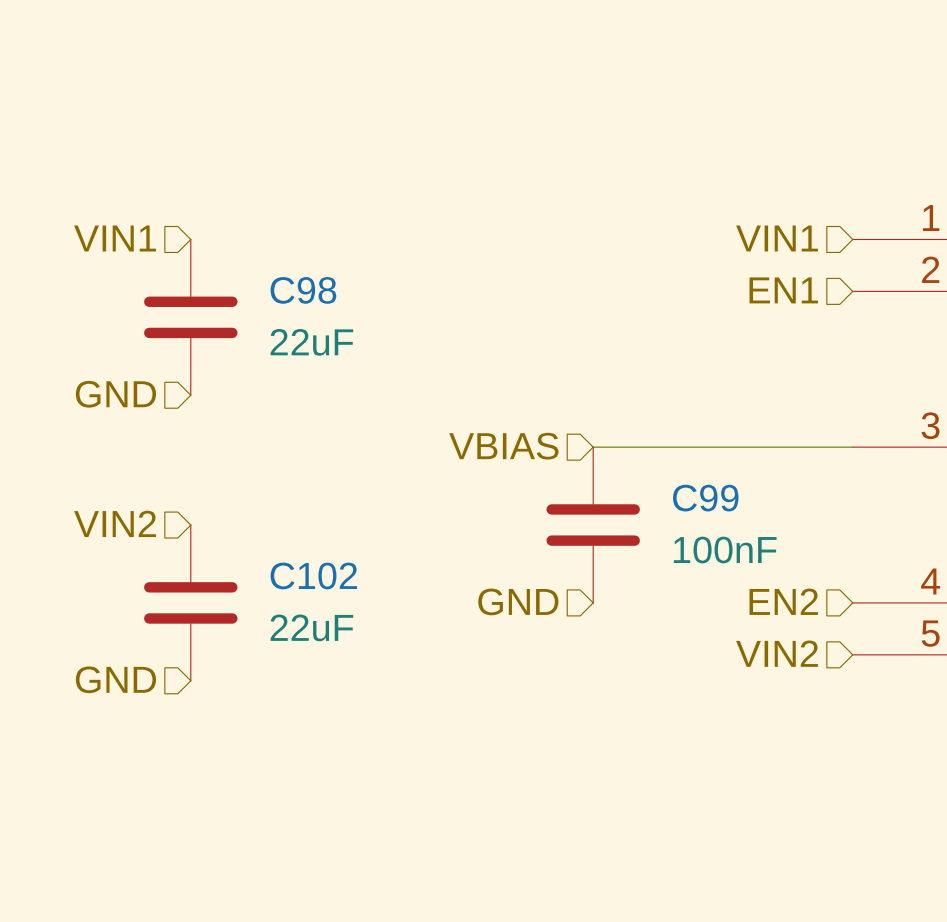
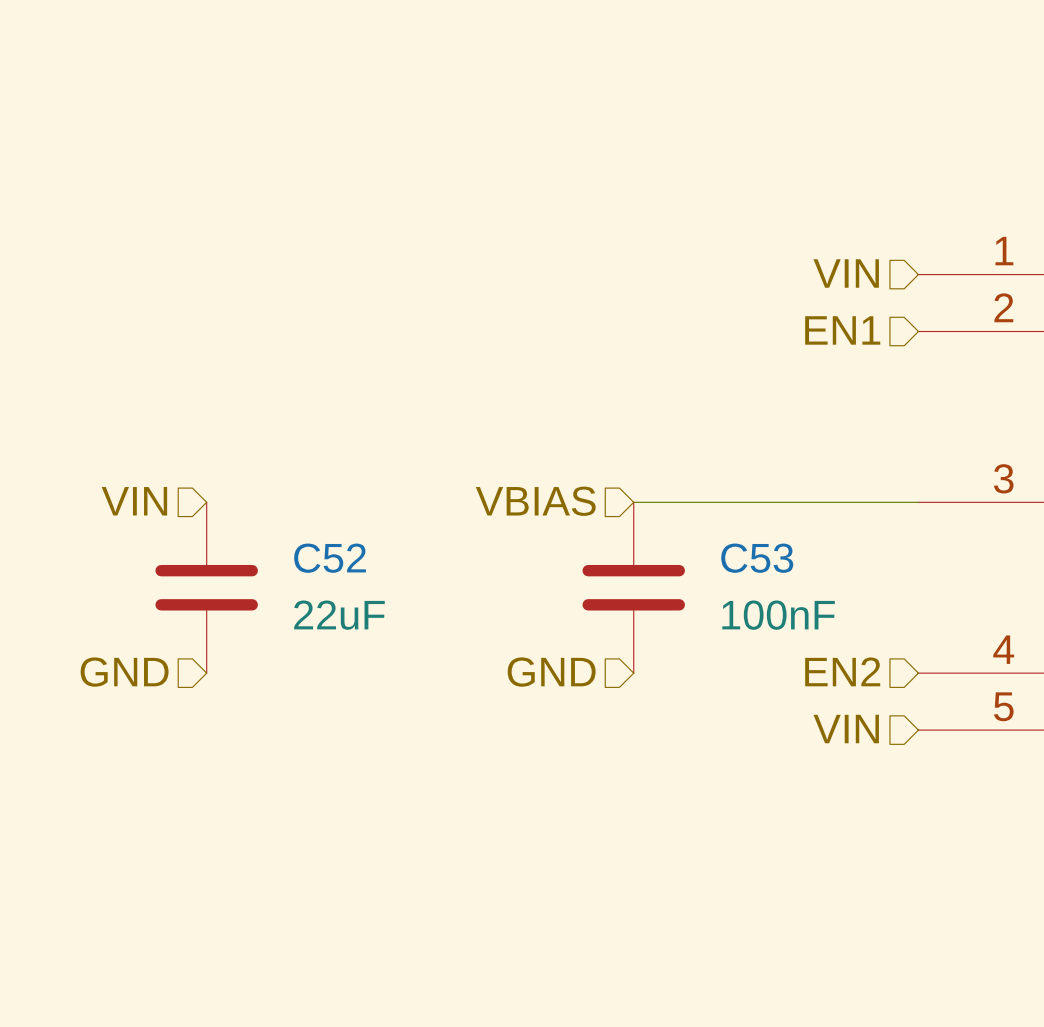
hierarchical label: VIN1 (115, 238) -> none
hierarchical label: VIN1 (777, 238) -> VIN (846, 273)
C98: 22uF (190, 317) -> none
hierarchical label: GND (115, 394) -> none
hierarchical label: none -> VIN (134, 501)
C99 name: C99 (705, 498) -> C53 (757, 558)
hierarchical label: VIN2 (115, 523) -> none
C52: none -> 22uF (206, 587)
C102: 22uF (190, 602) -> none
hierarchical label: VIN2 (777, 653) -> VIN (846, 729)
hierarchical label position: GND (115, 679) -> GND (124, 672)

